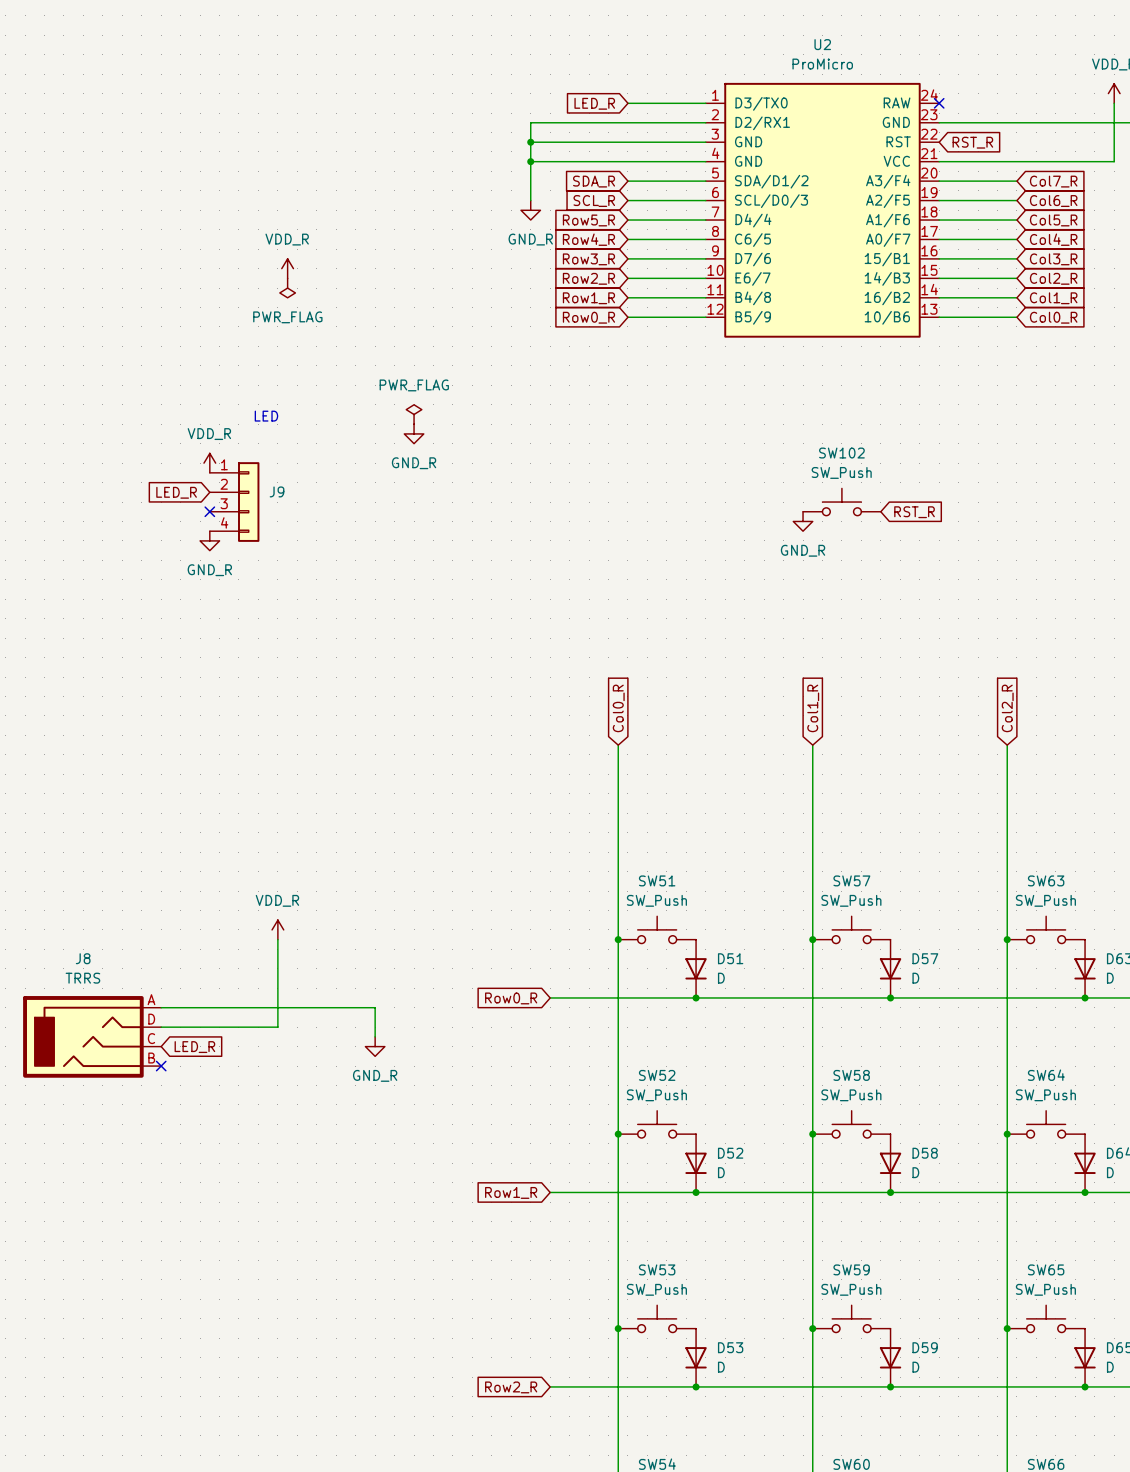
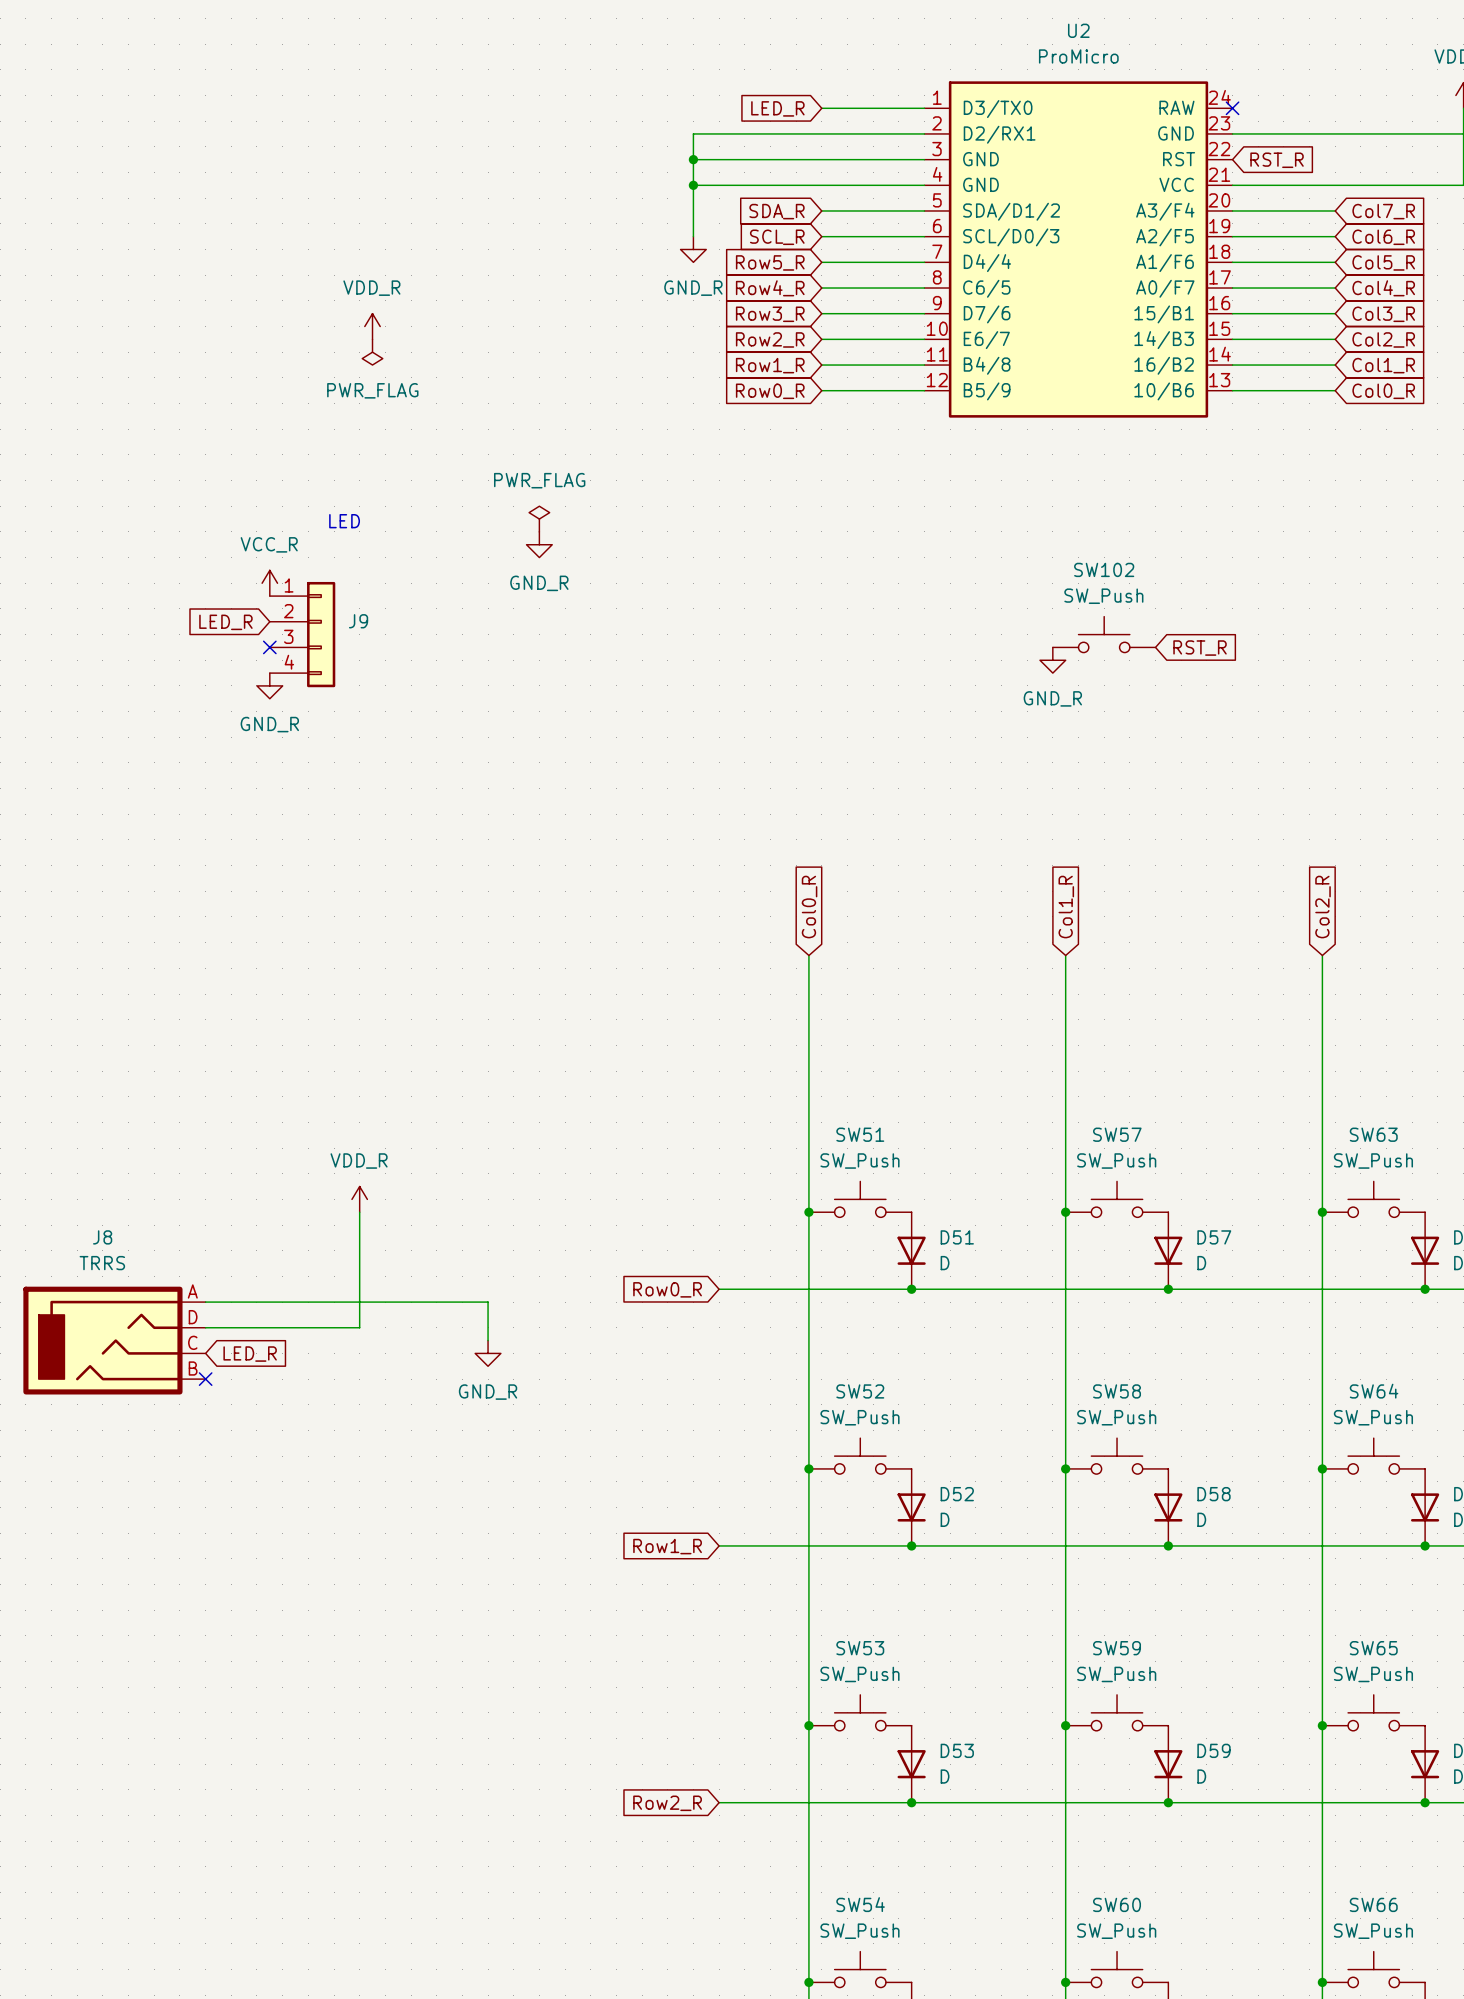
power symbol: VDD_R (209, 463) -> VCC_R (269, 583)

